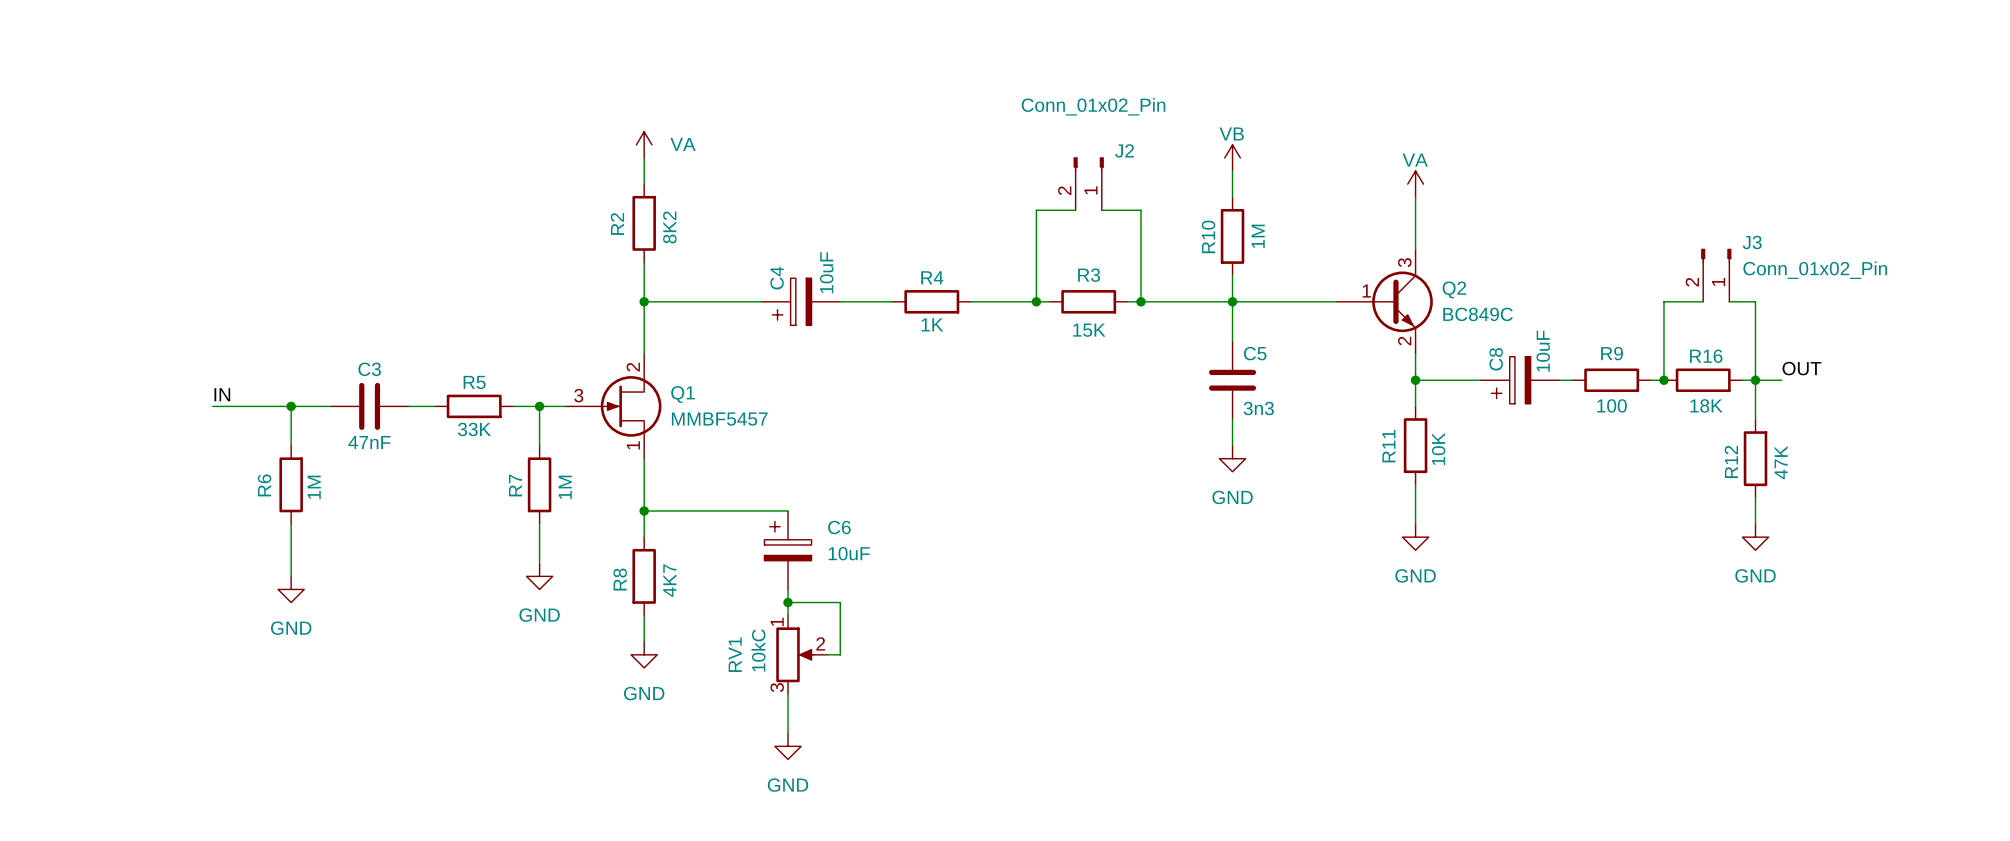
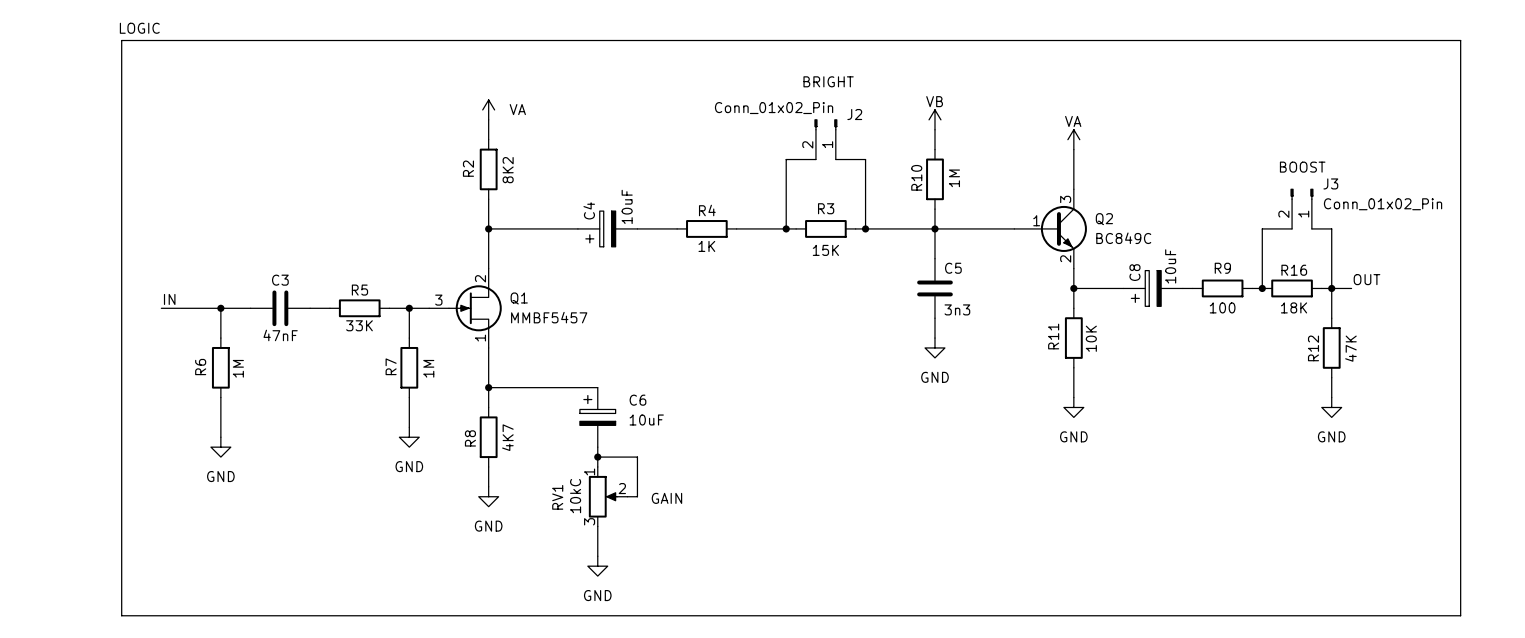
text: none -> LOGIC (139, 28)
line: none -> (121, 40) (1460, 40) (1460, 615) (121, 615) (121, 40)
J2 value position: Conn_01x02_Pin (1093, 106) -> Conn_01x02_Pin (774, 108)
text: none -> BRIGHT (828, 81)
text: none -> BOOST (1302, 167)
text: none -> GAIN (666, 498)

